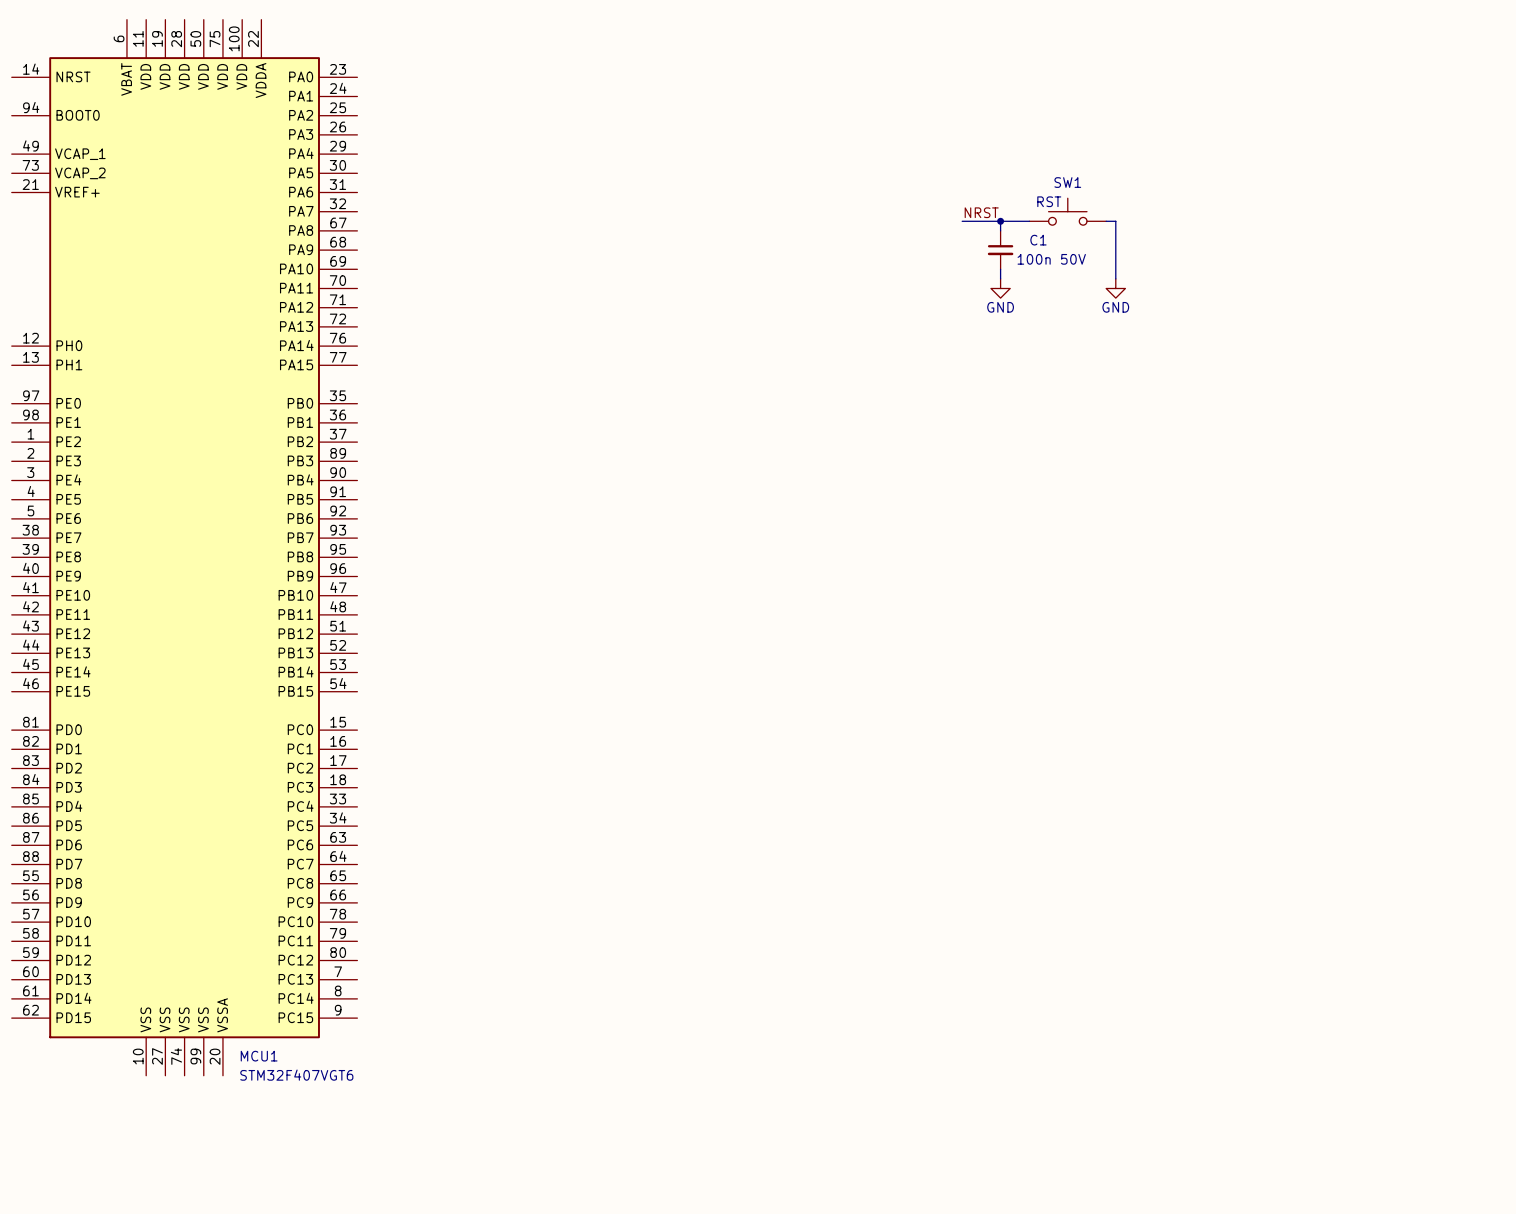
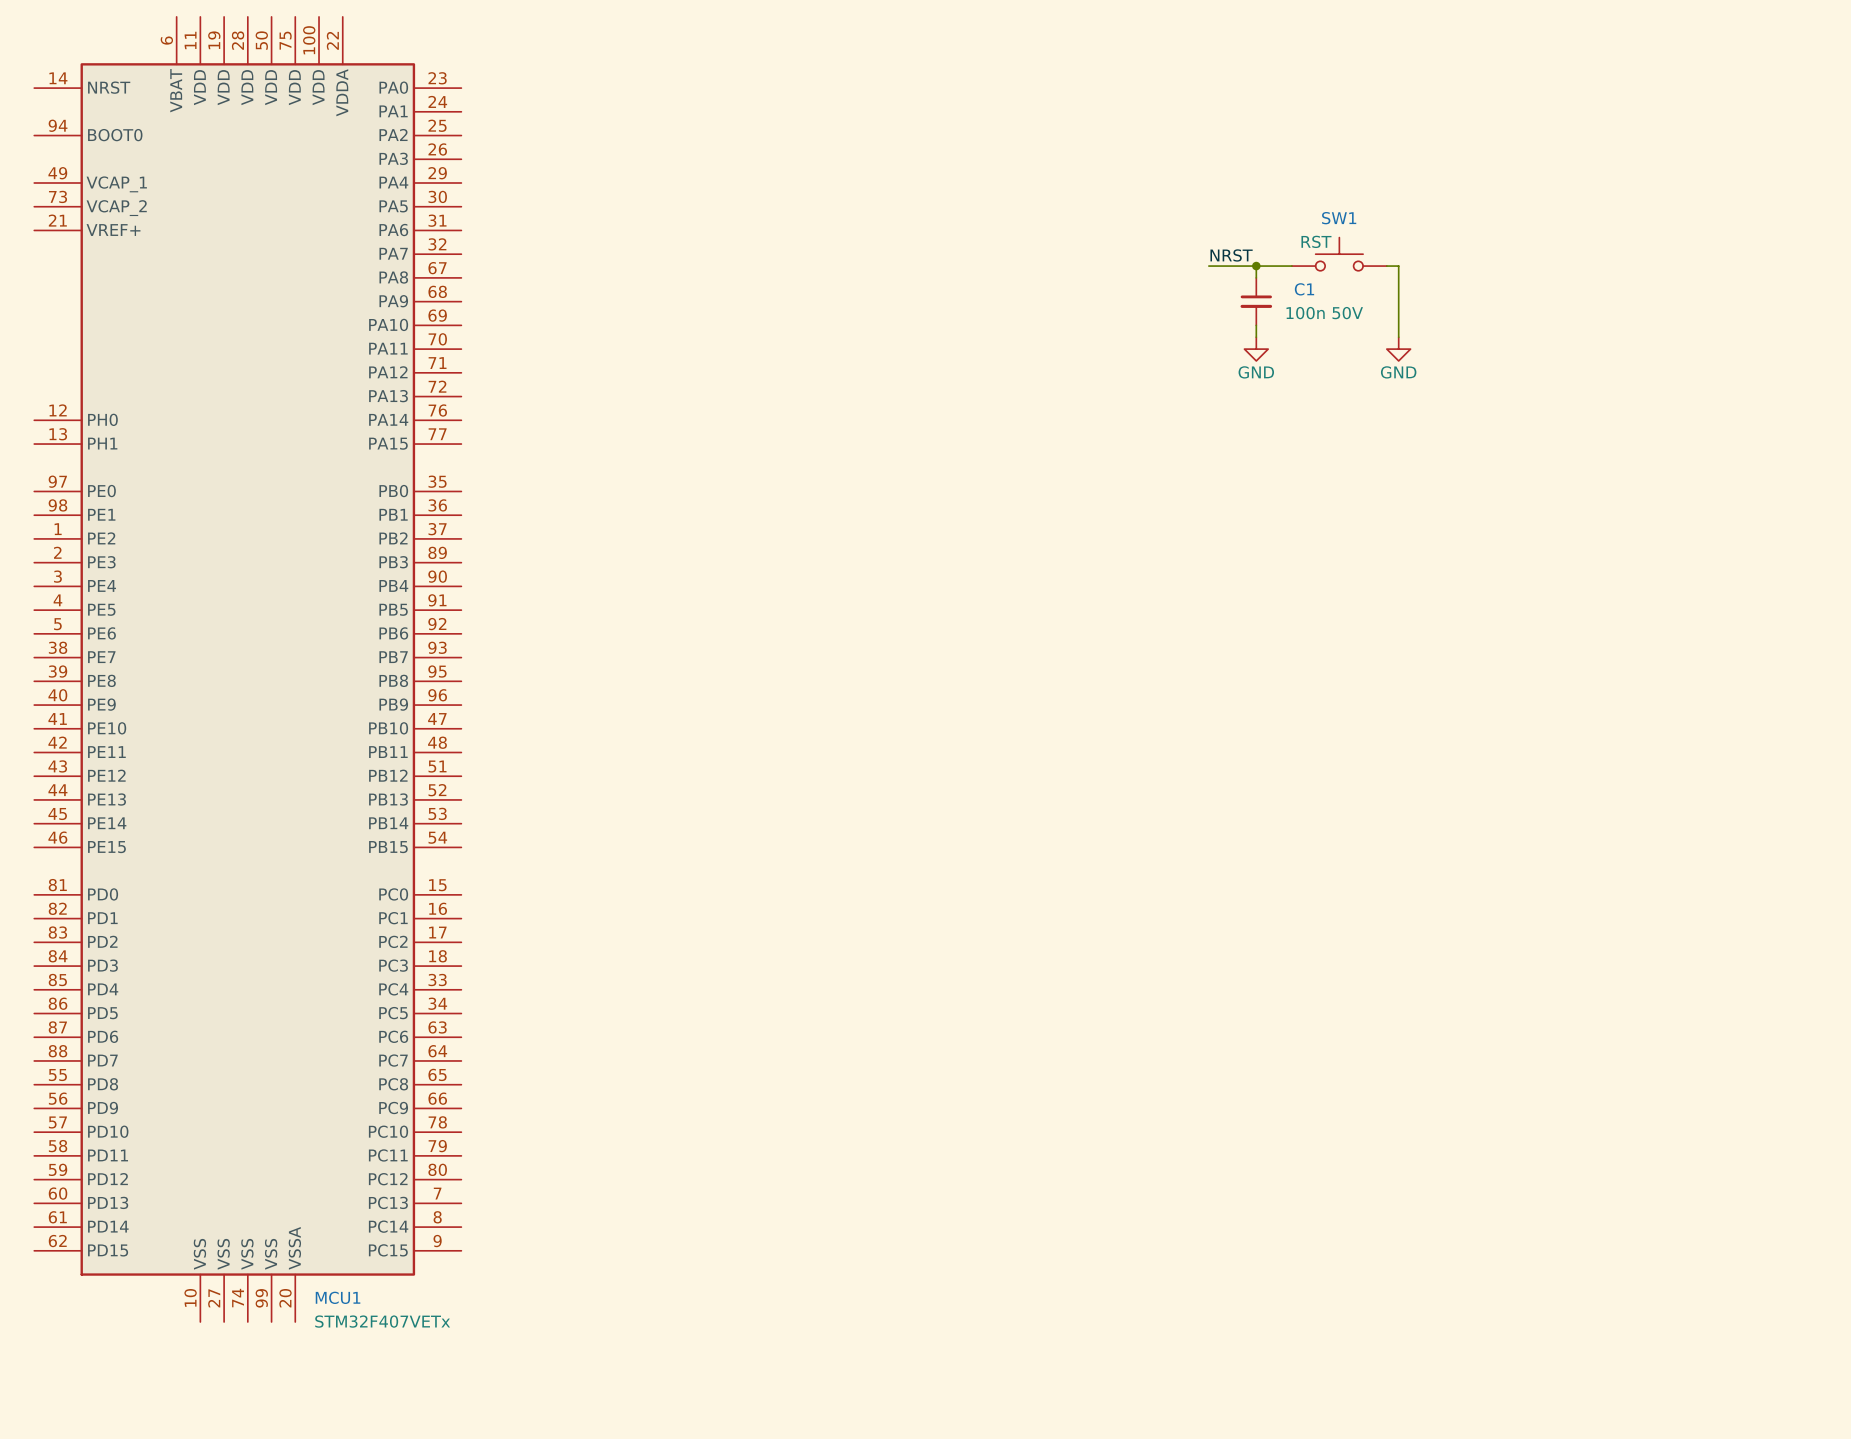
MCU1 value: STM32F407VGT6 (296, 1075) -> STM32F407VETx (382, 1321)

